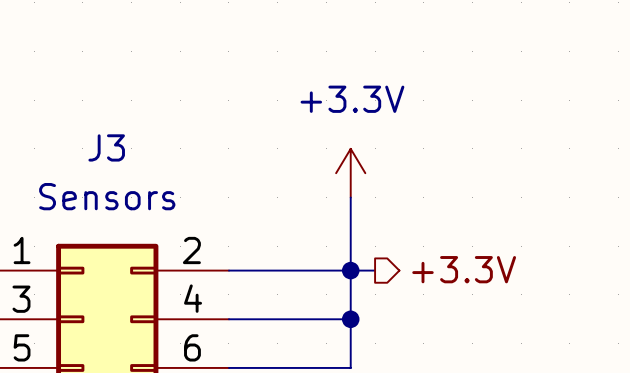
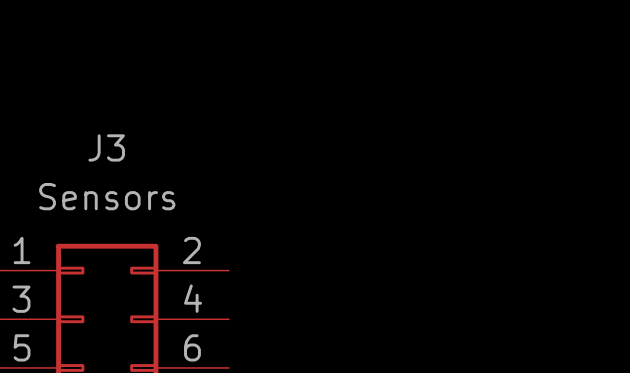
power symbol: +3.3V (350, 173) -> none
wire: (350, 197) (350, 367) (228, 367) -> none
hierarchical label: +3.3V (464, 269) -> none
wire: (228, 270) (375, 270) -> none
junction: (350, 270) -> none
wire: (228, 319) (350, 319) -> none
junction: (350, 319) -> none

